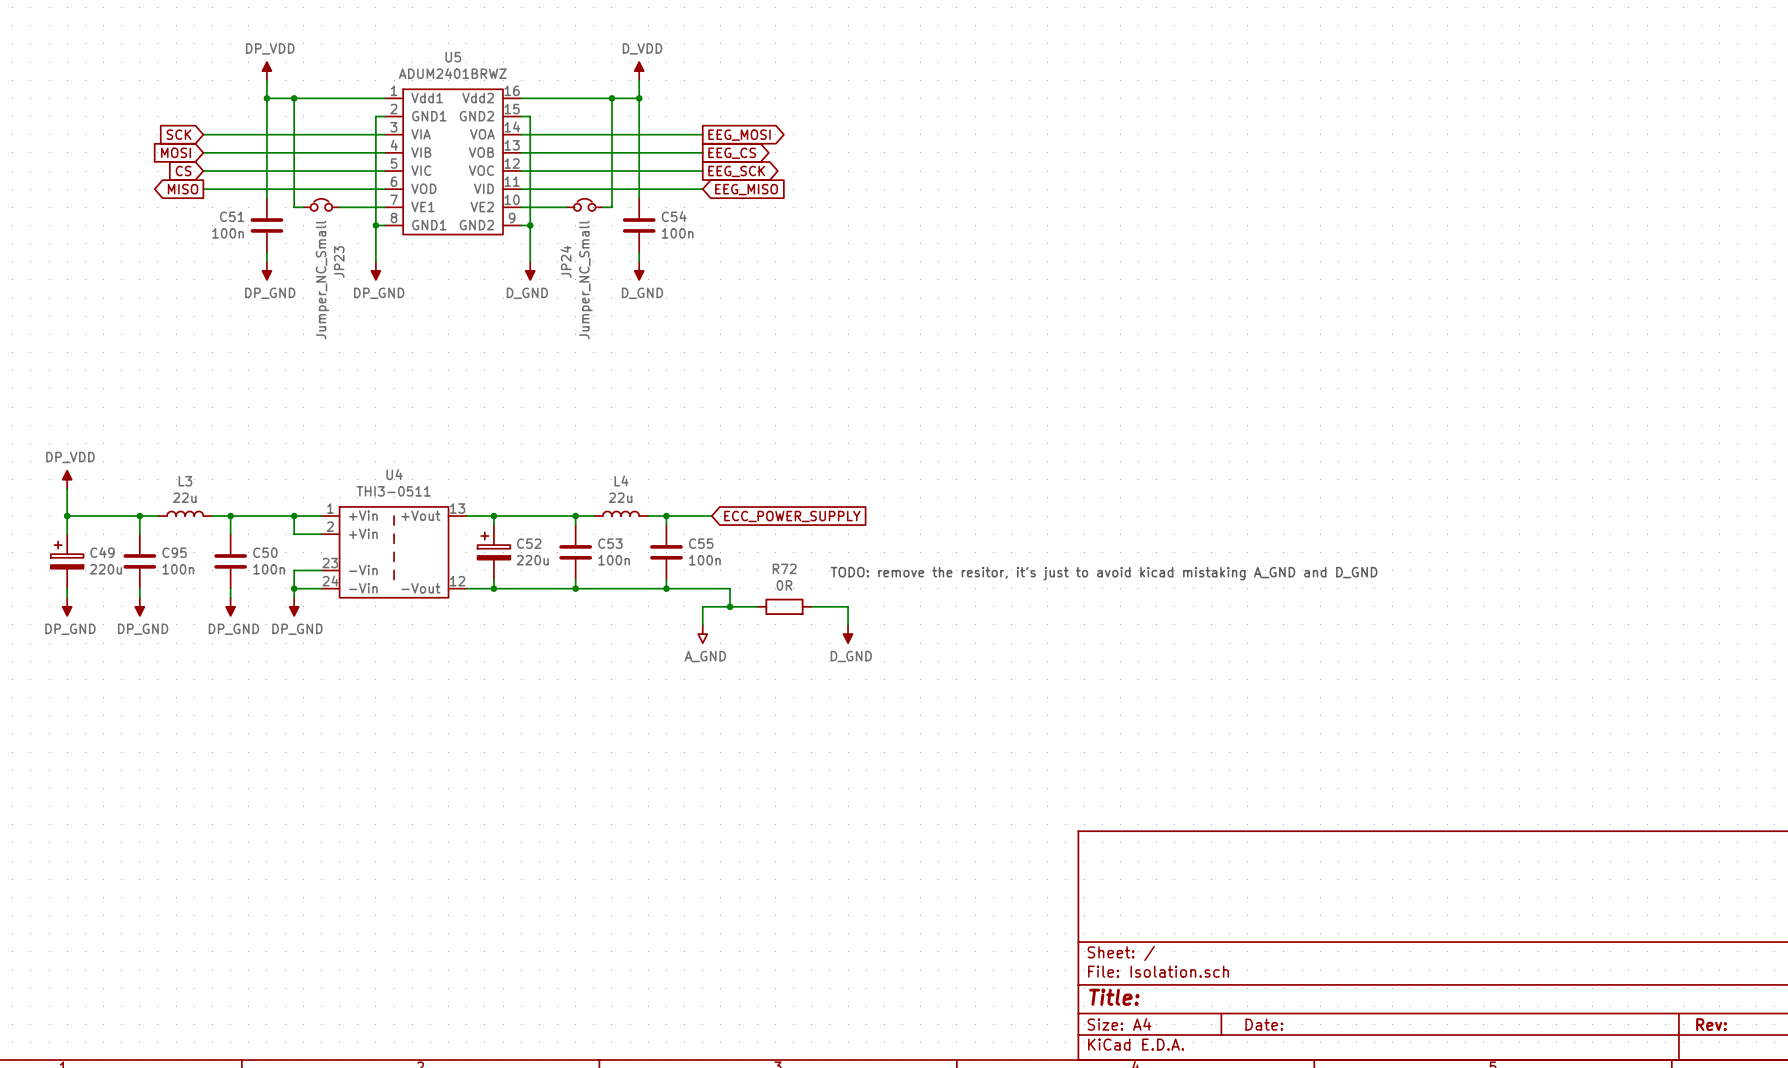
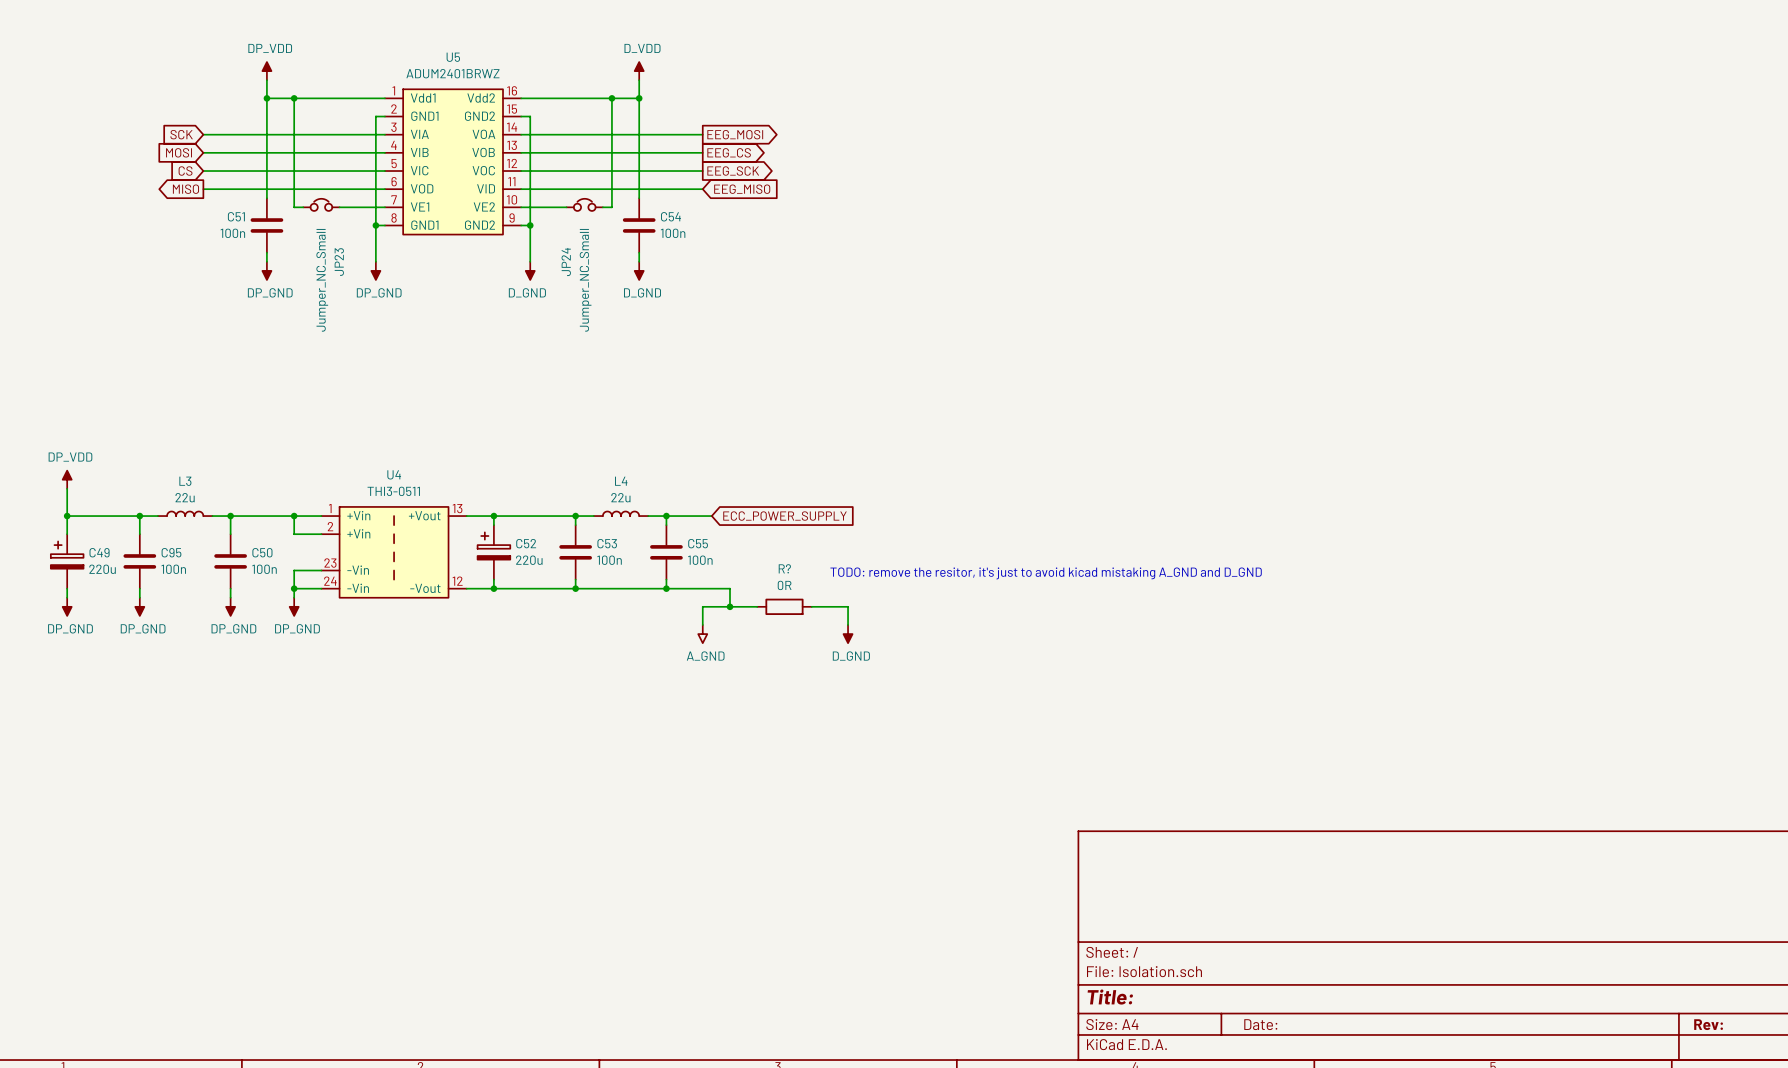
R72 name: R72 (784, 568) -> R? (784, 568)

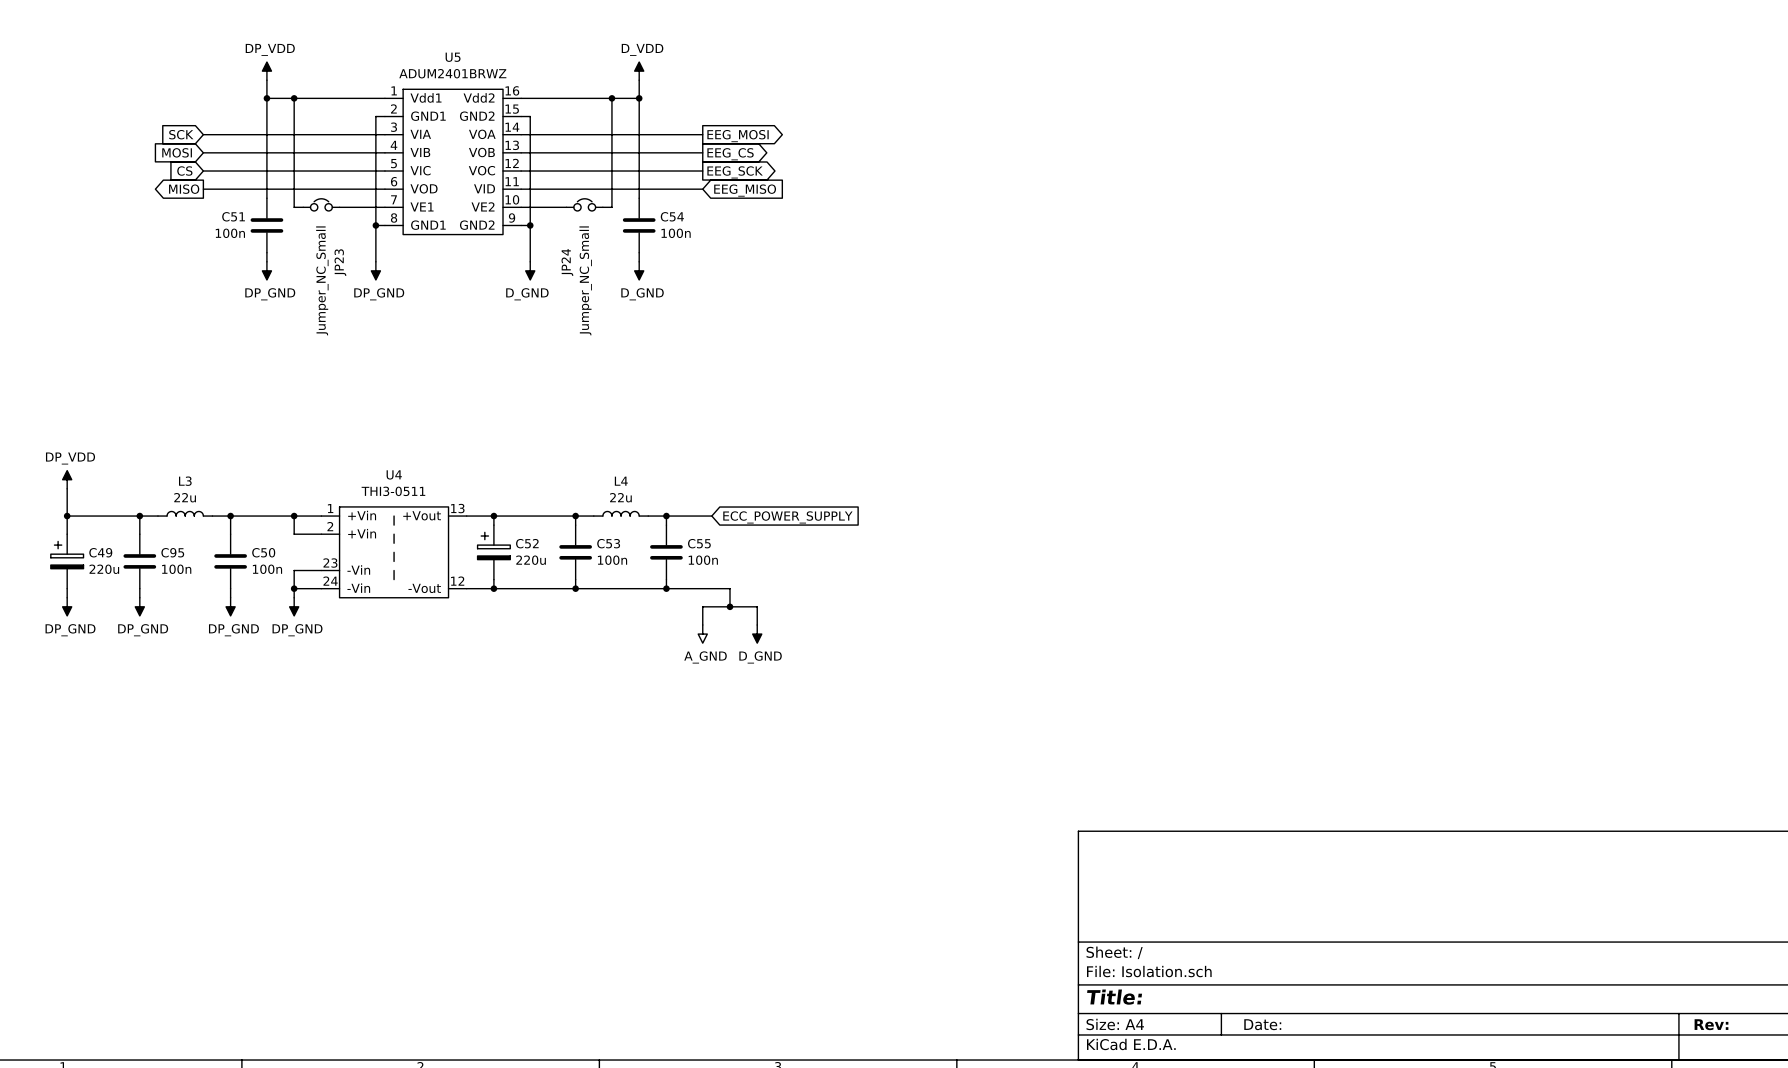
text: TODO: remove the resitor, it's just to avoid kicad mistaking A_GND and D_GND (1046, 573) -> none
wire: none -> (757, 606) (757, 624)
R?: 0R (784, 606) -> none
wire: (811, 606) (848, 606) (848, 624) -> none
power symbol position: D_GND (848, 634) -> D_GND (757, 634)

